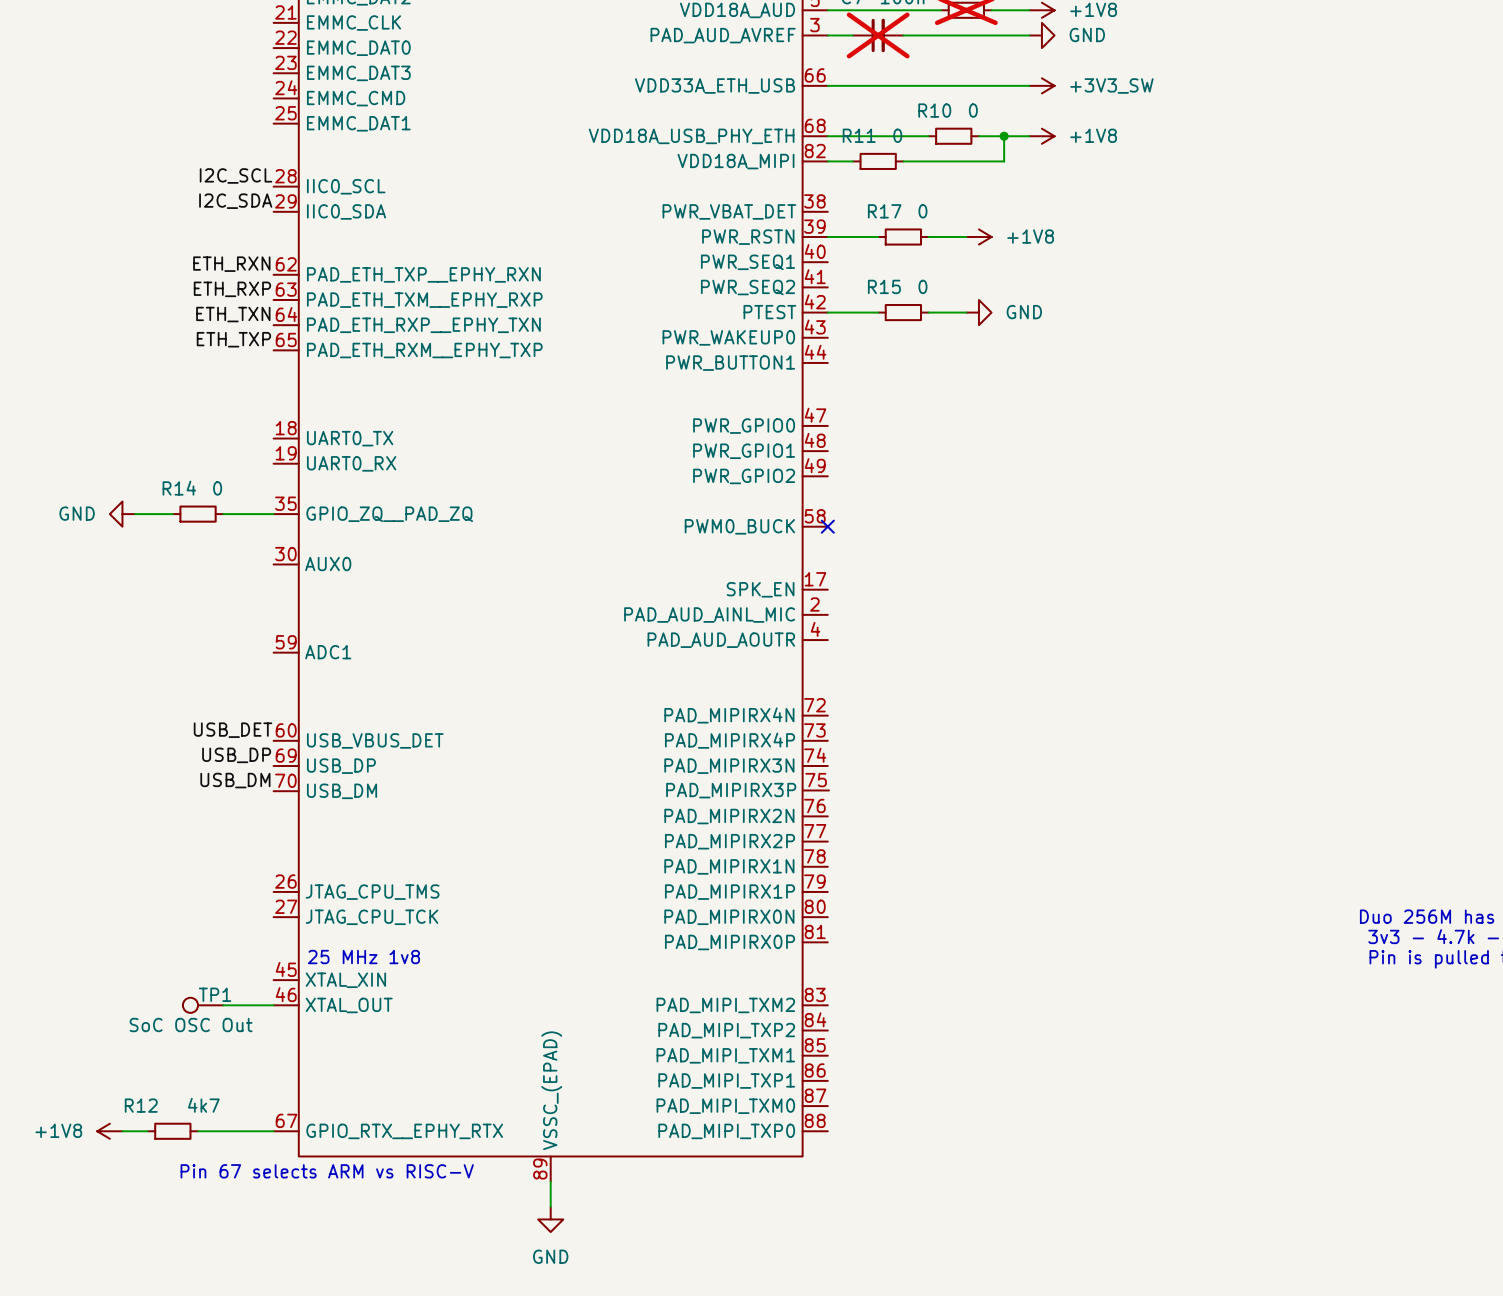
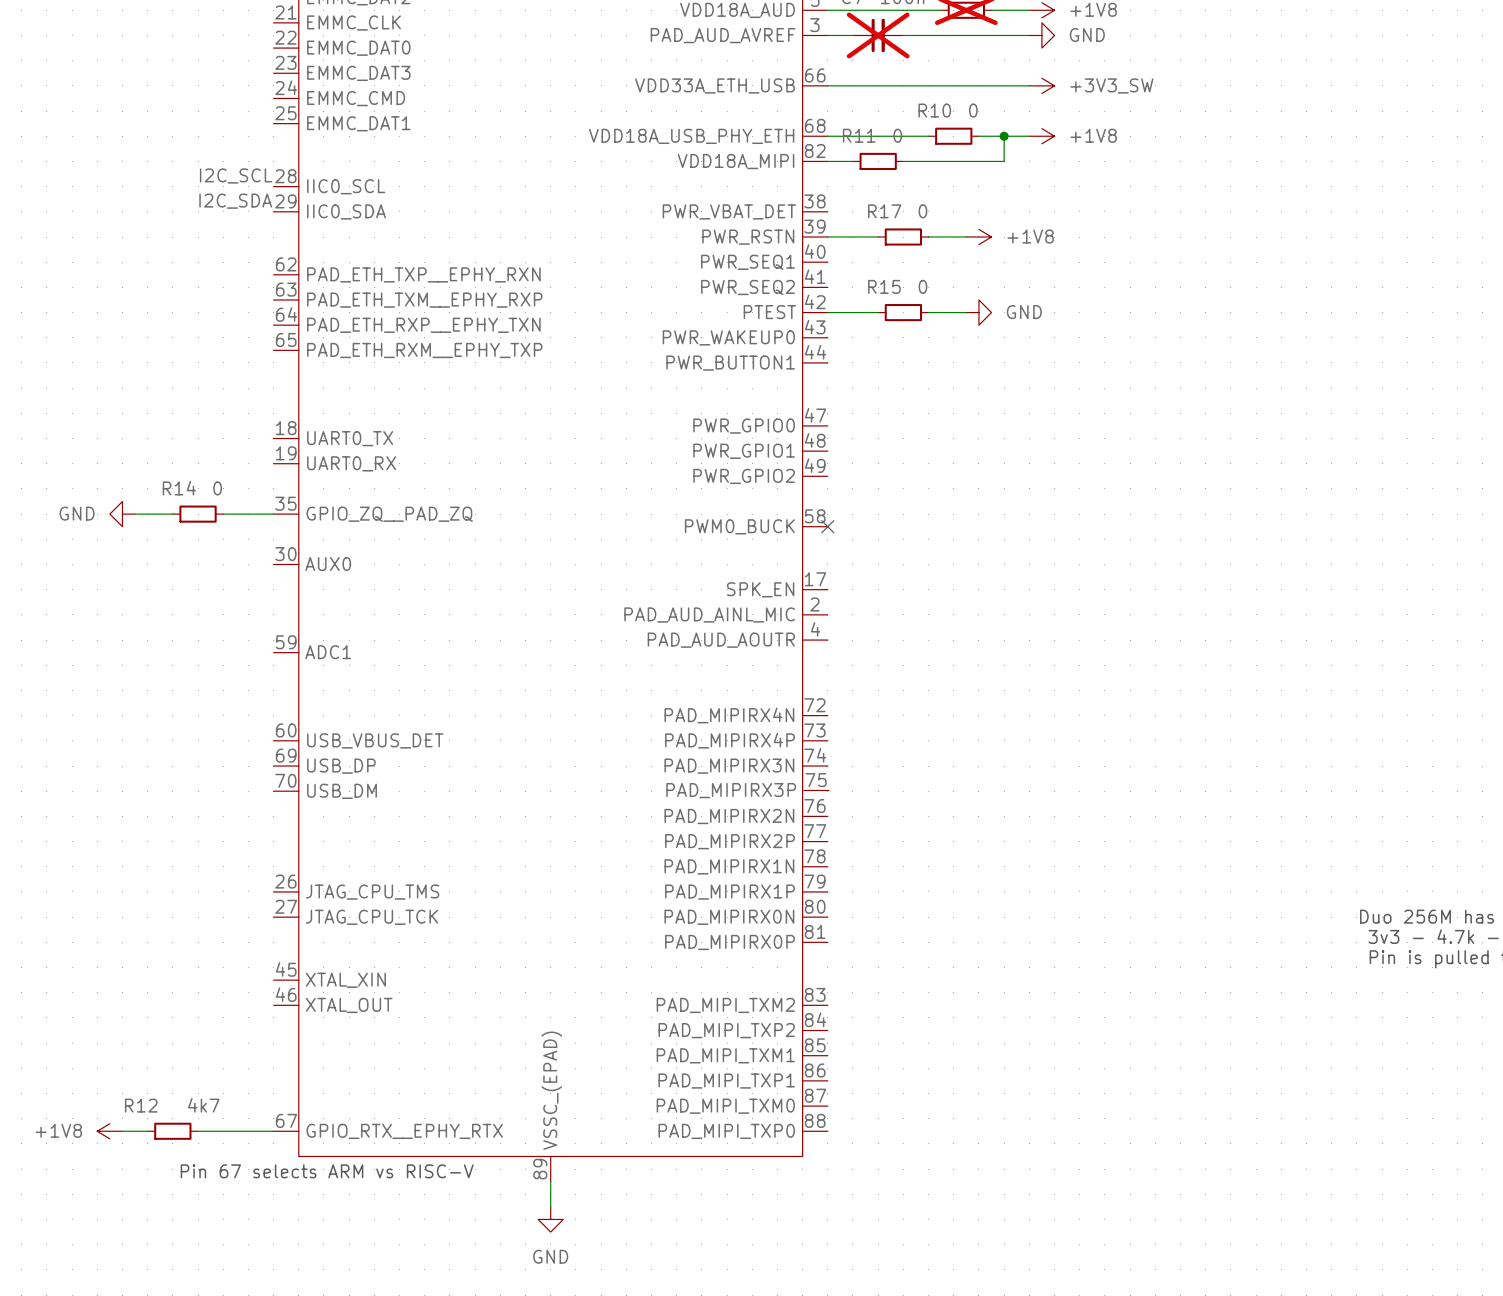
label: ETH_RXN (231, 264) -> none
label: ETH_RXP (232, 289) -> none
label: ETH_TXN (233, 314) -> none
label: ETH_TXP (233, 339) -> none
label: USB_DET (233, 730) -> none
label: USB_DP (236, 755) -> none
label: USB_DM (235, 780) -> none
text: 25 MHz 1v8 (363, 957) -> none
TP1: SoC OSC Out (203, 1005) -> none
wire: (223, 1005) (273, 1005) -> none

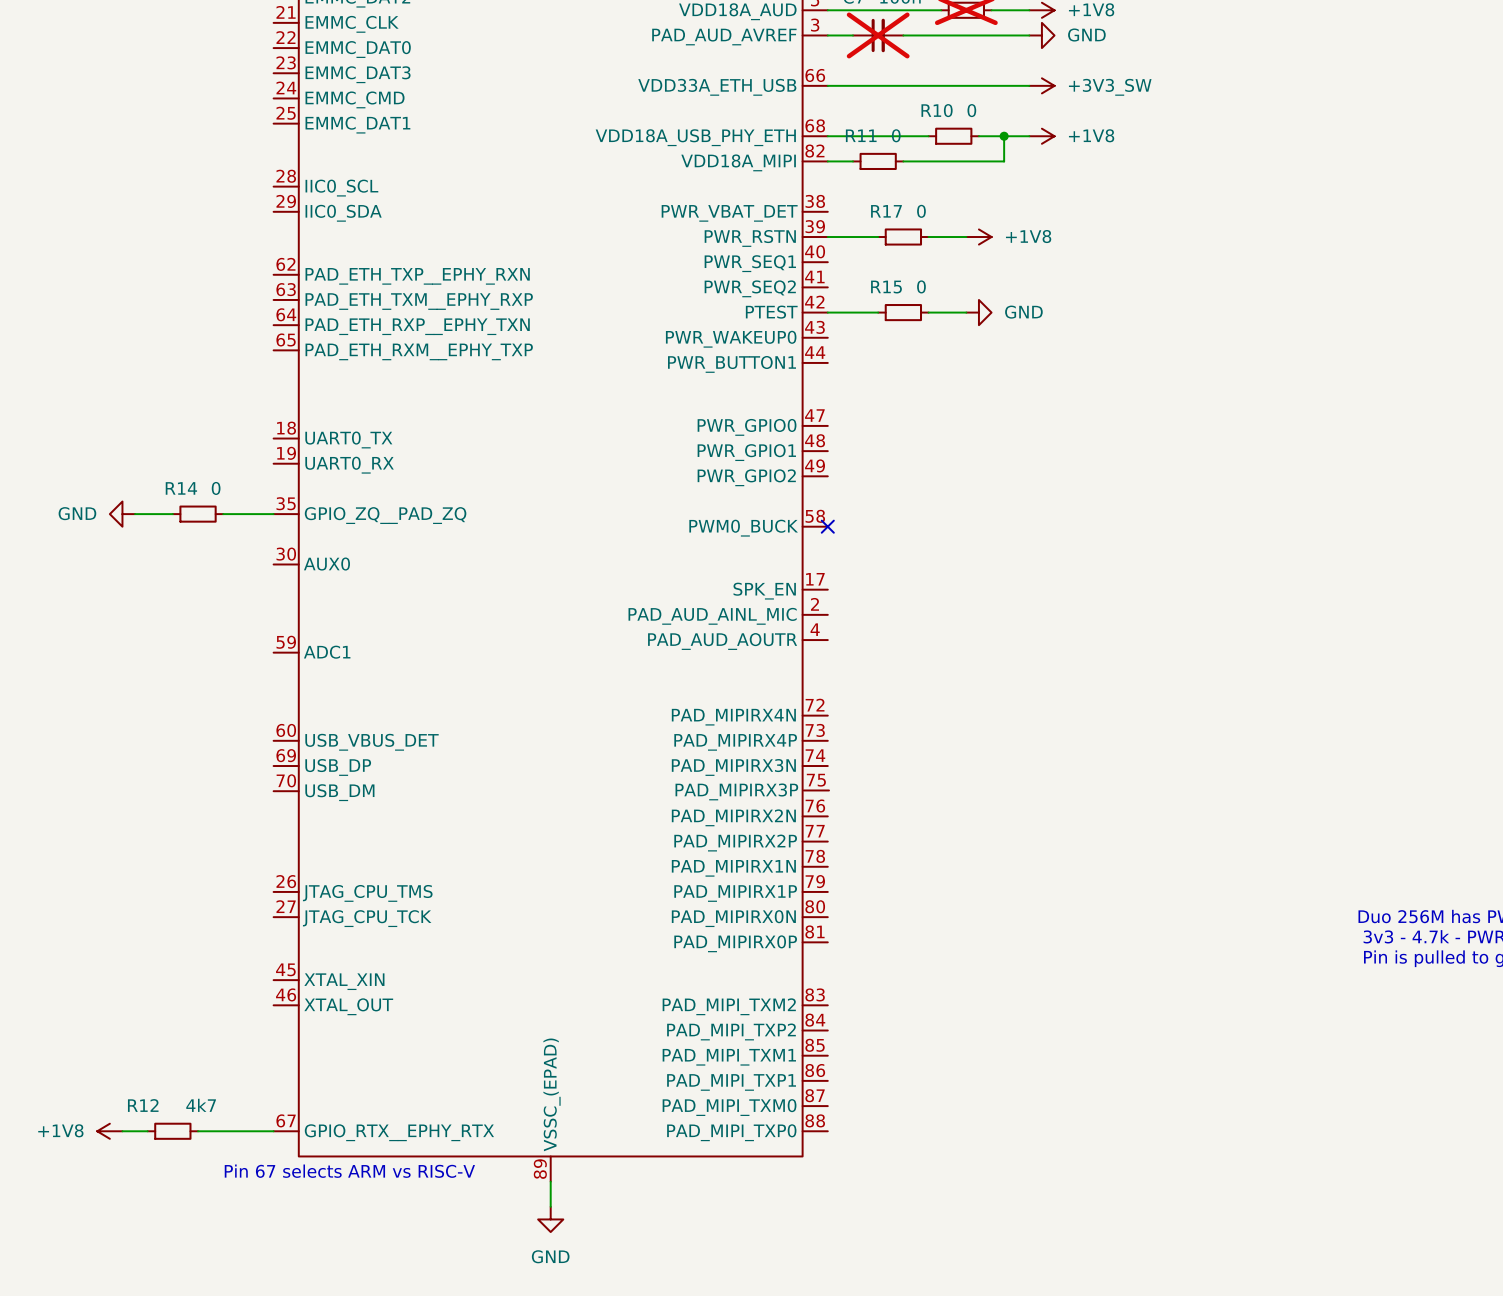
label: I2C_SCL (236, 175) -> none
label: I2C_SDA (235, 201) -> none

